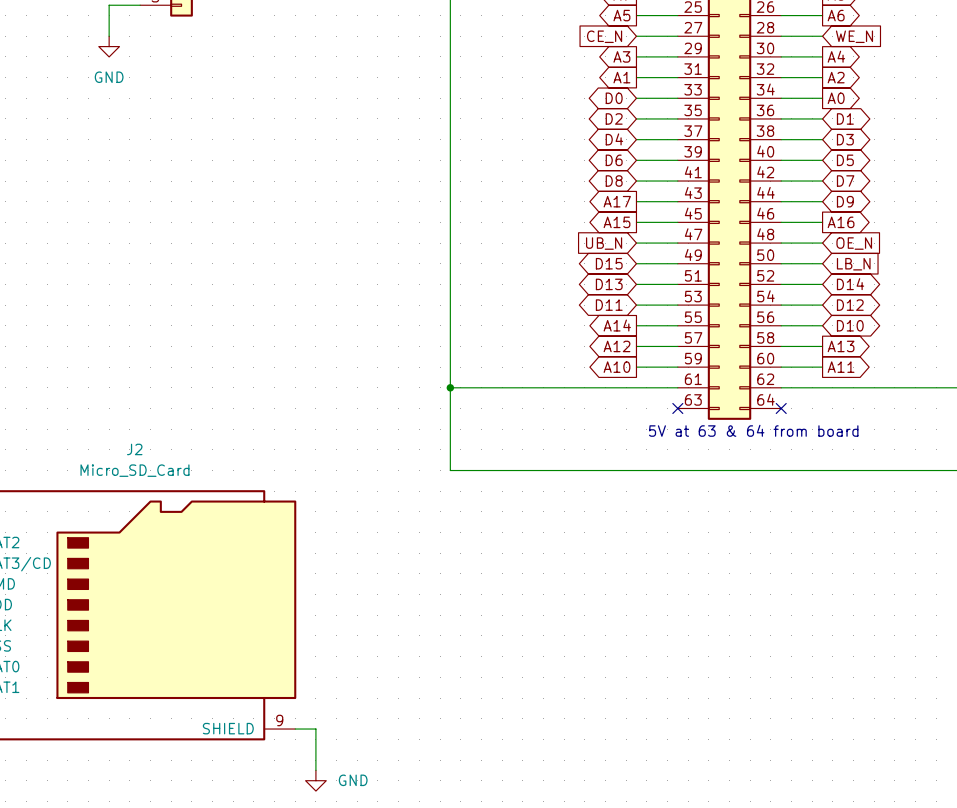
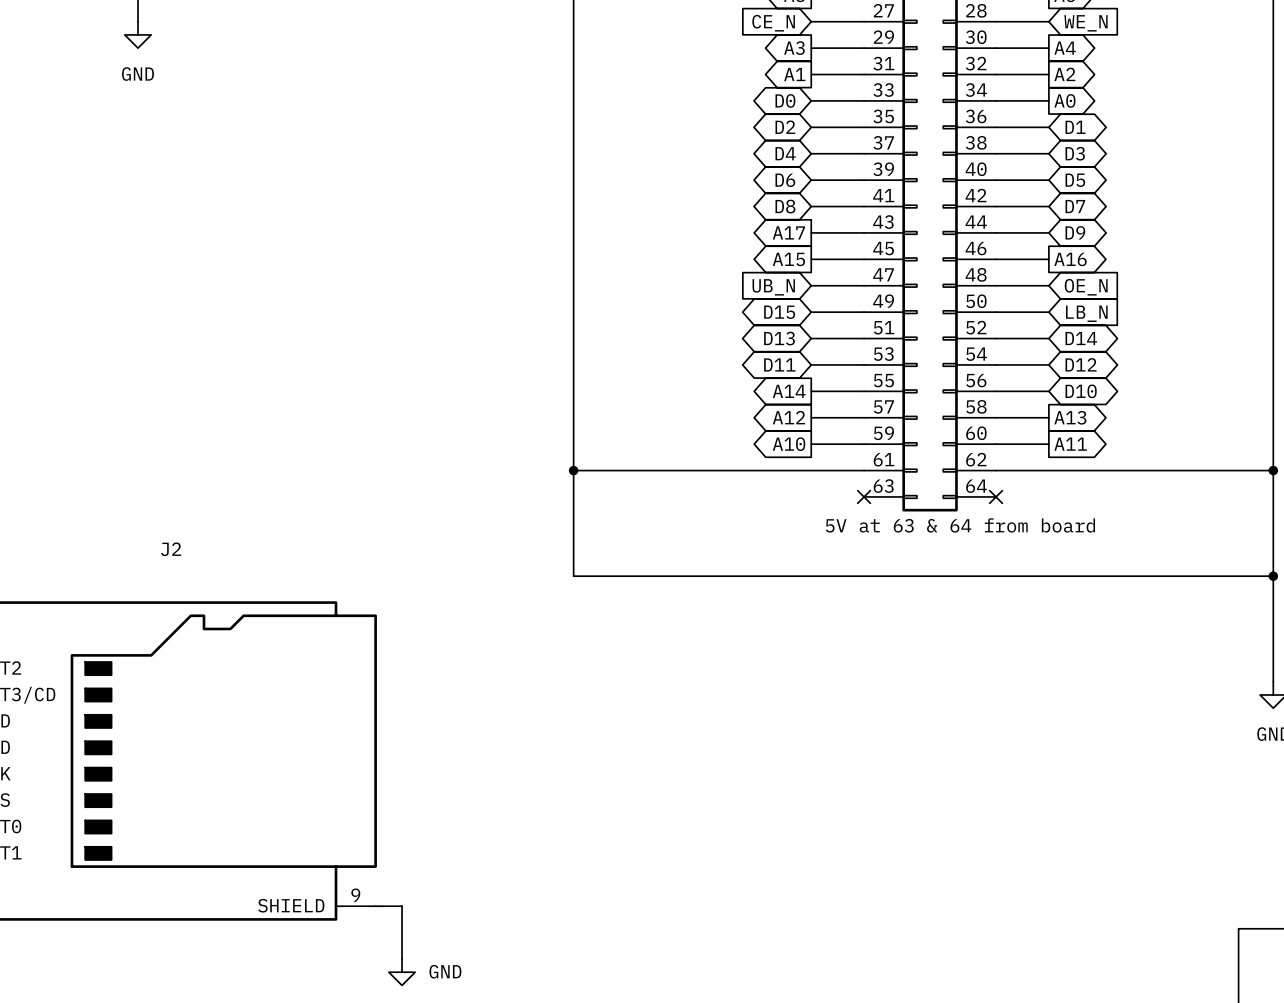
J2 value: Micro_SD_Card (134, 470) -> none

